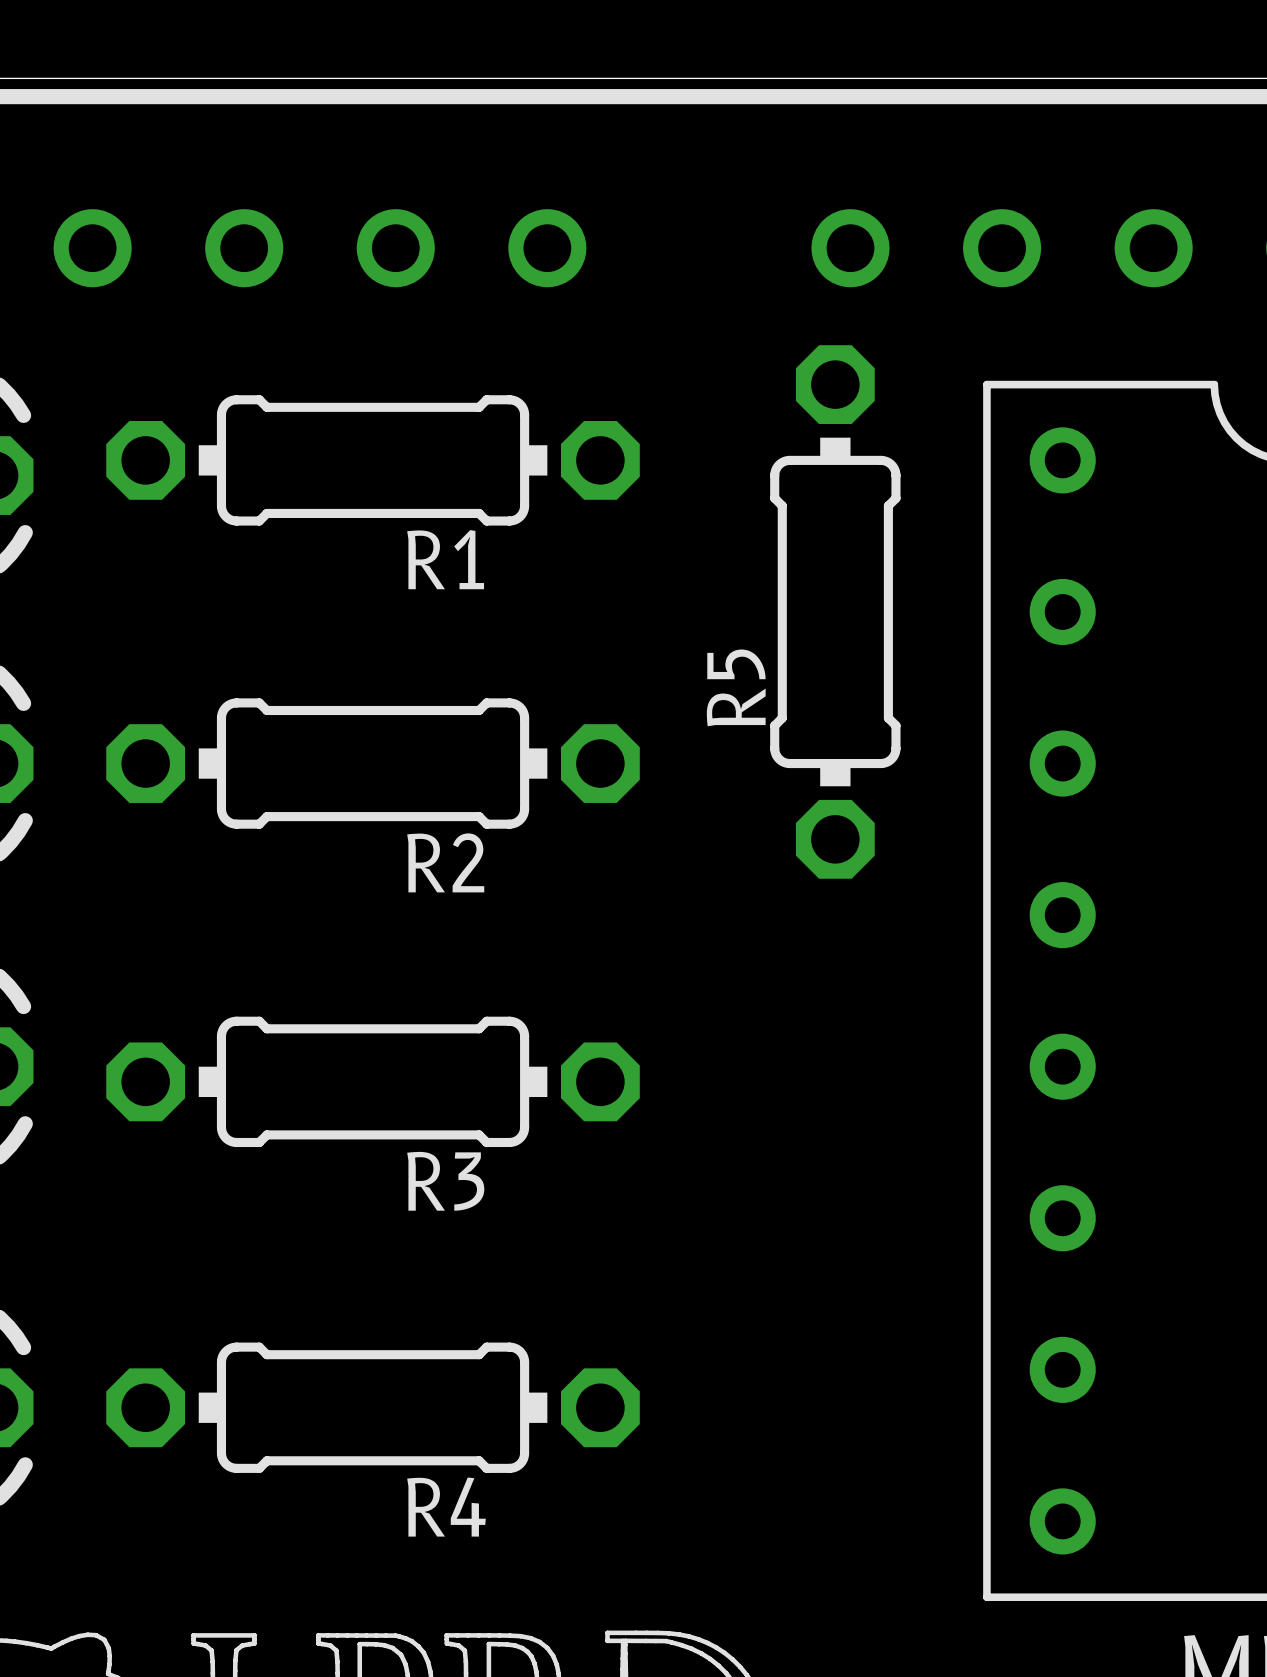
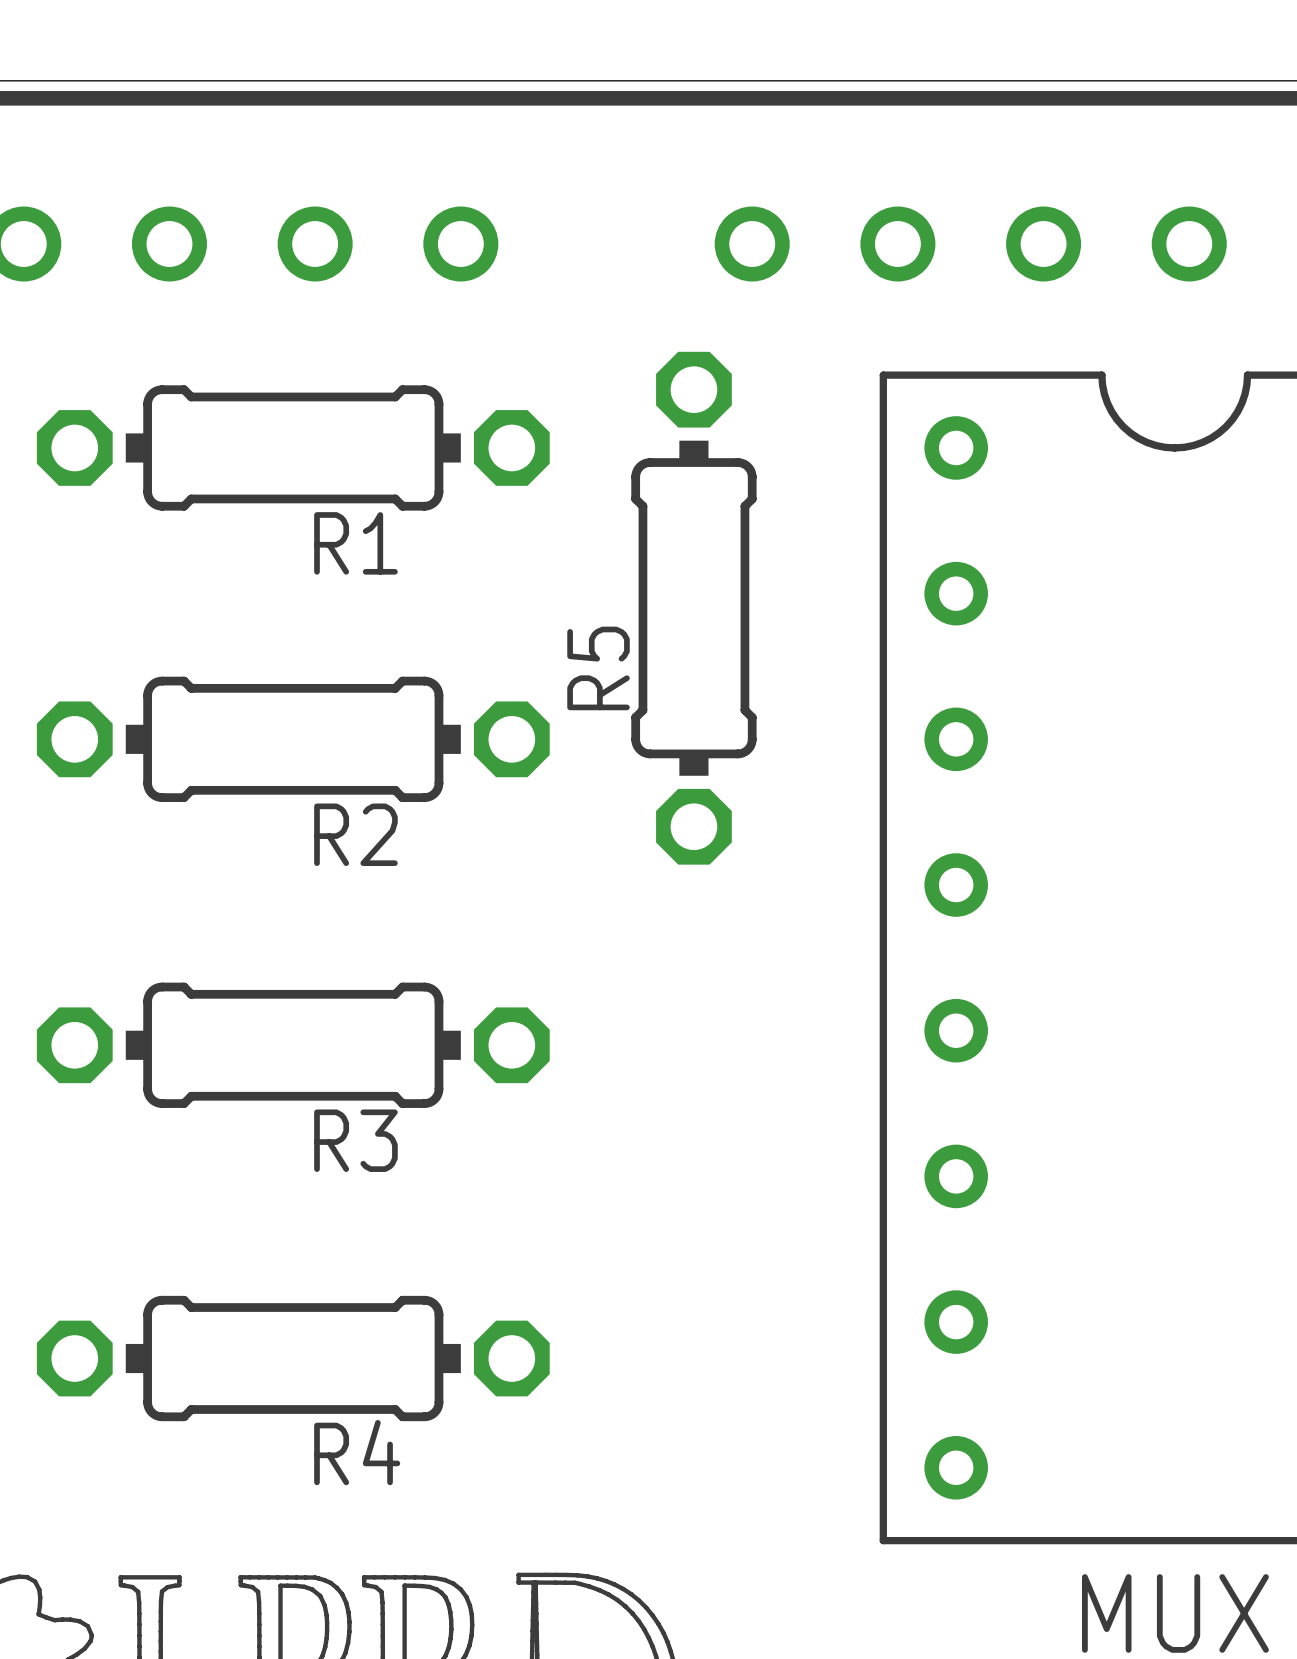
R5 position: (835, 611) -> (693, 608)

